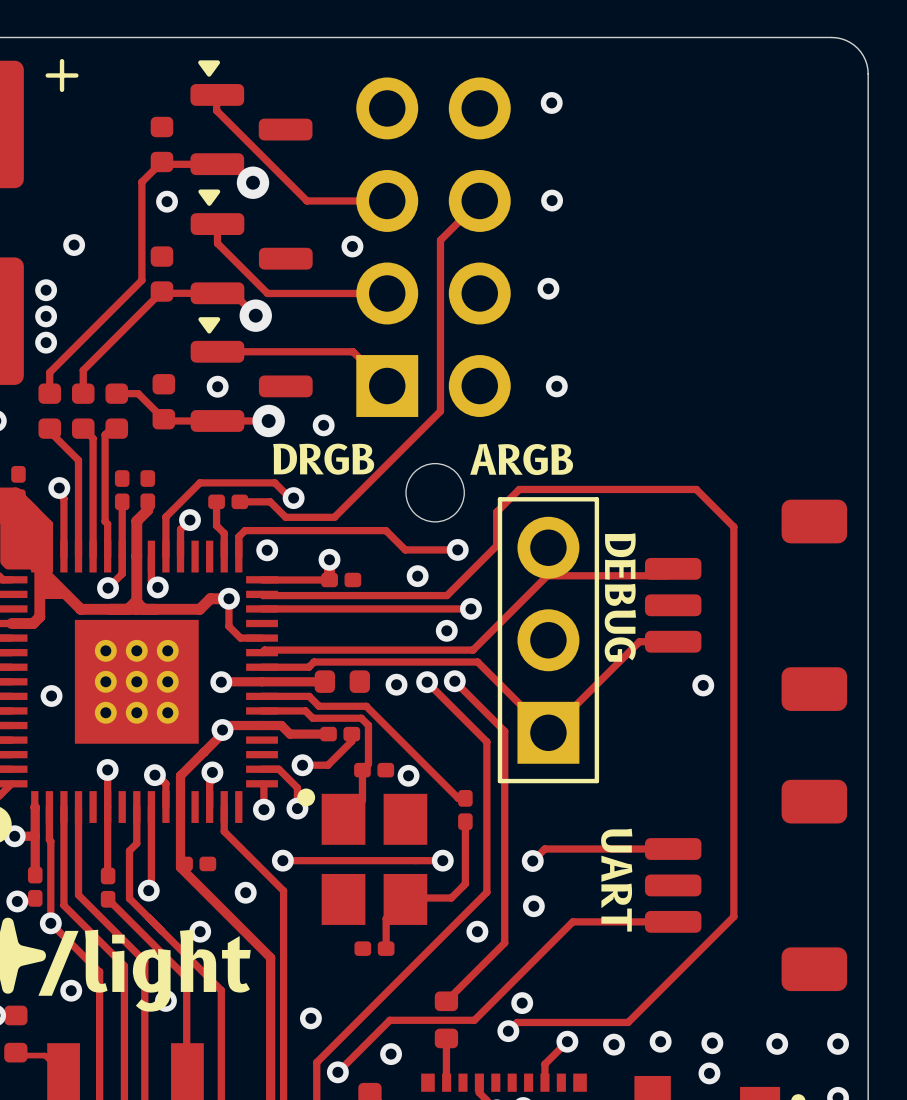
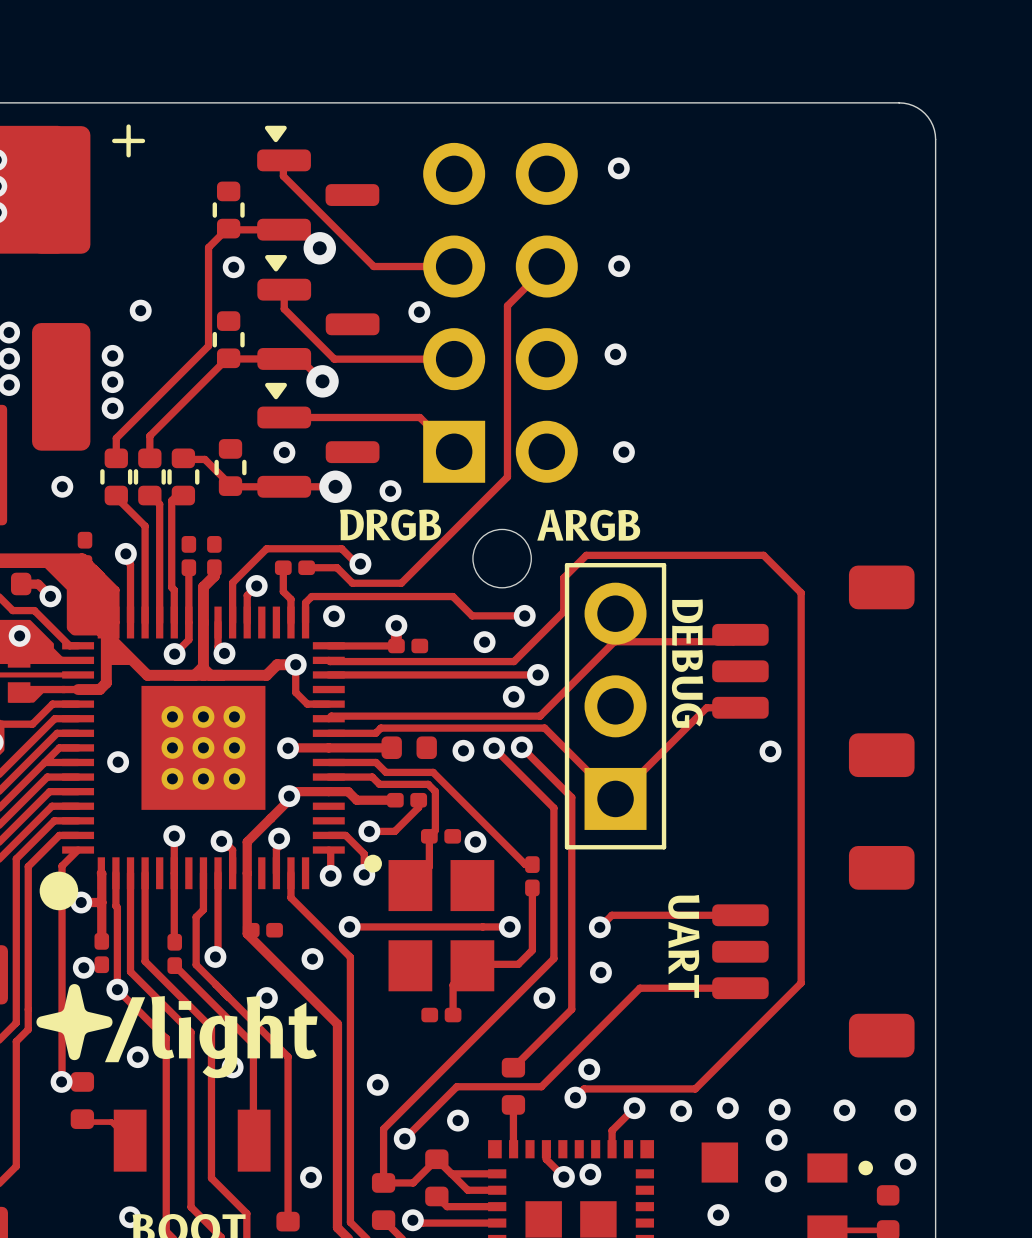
part footprint: [150, 116, 174, 173] -> [212, 181, 245, 239]
part footprint: [150, 246, 174, 302] -> [212, 311, 245, 369]
part footprint: [152, 374, 176, 430] -> [214, 439, 247, 496]
part footprint: [38, 383, 62, 439] -> [100, 448, 133, 506]
part footprint: [71, 383, 95, 439] -> [133, 448, 166, 506]
part footprint: [105, 383, 129, 439] -> [167, 448, 200, 506]

